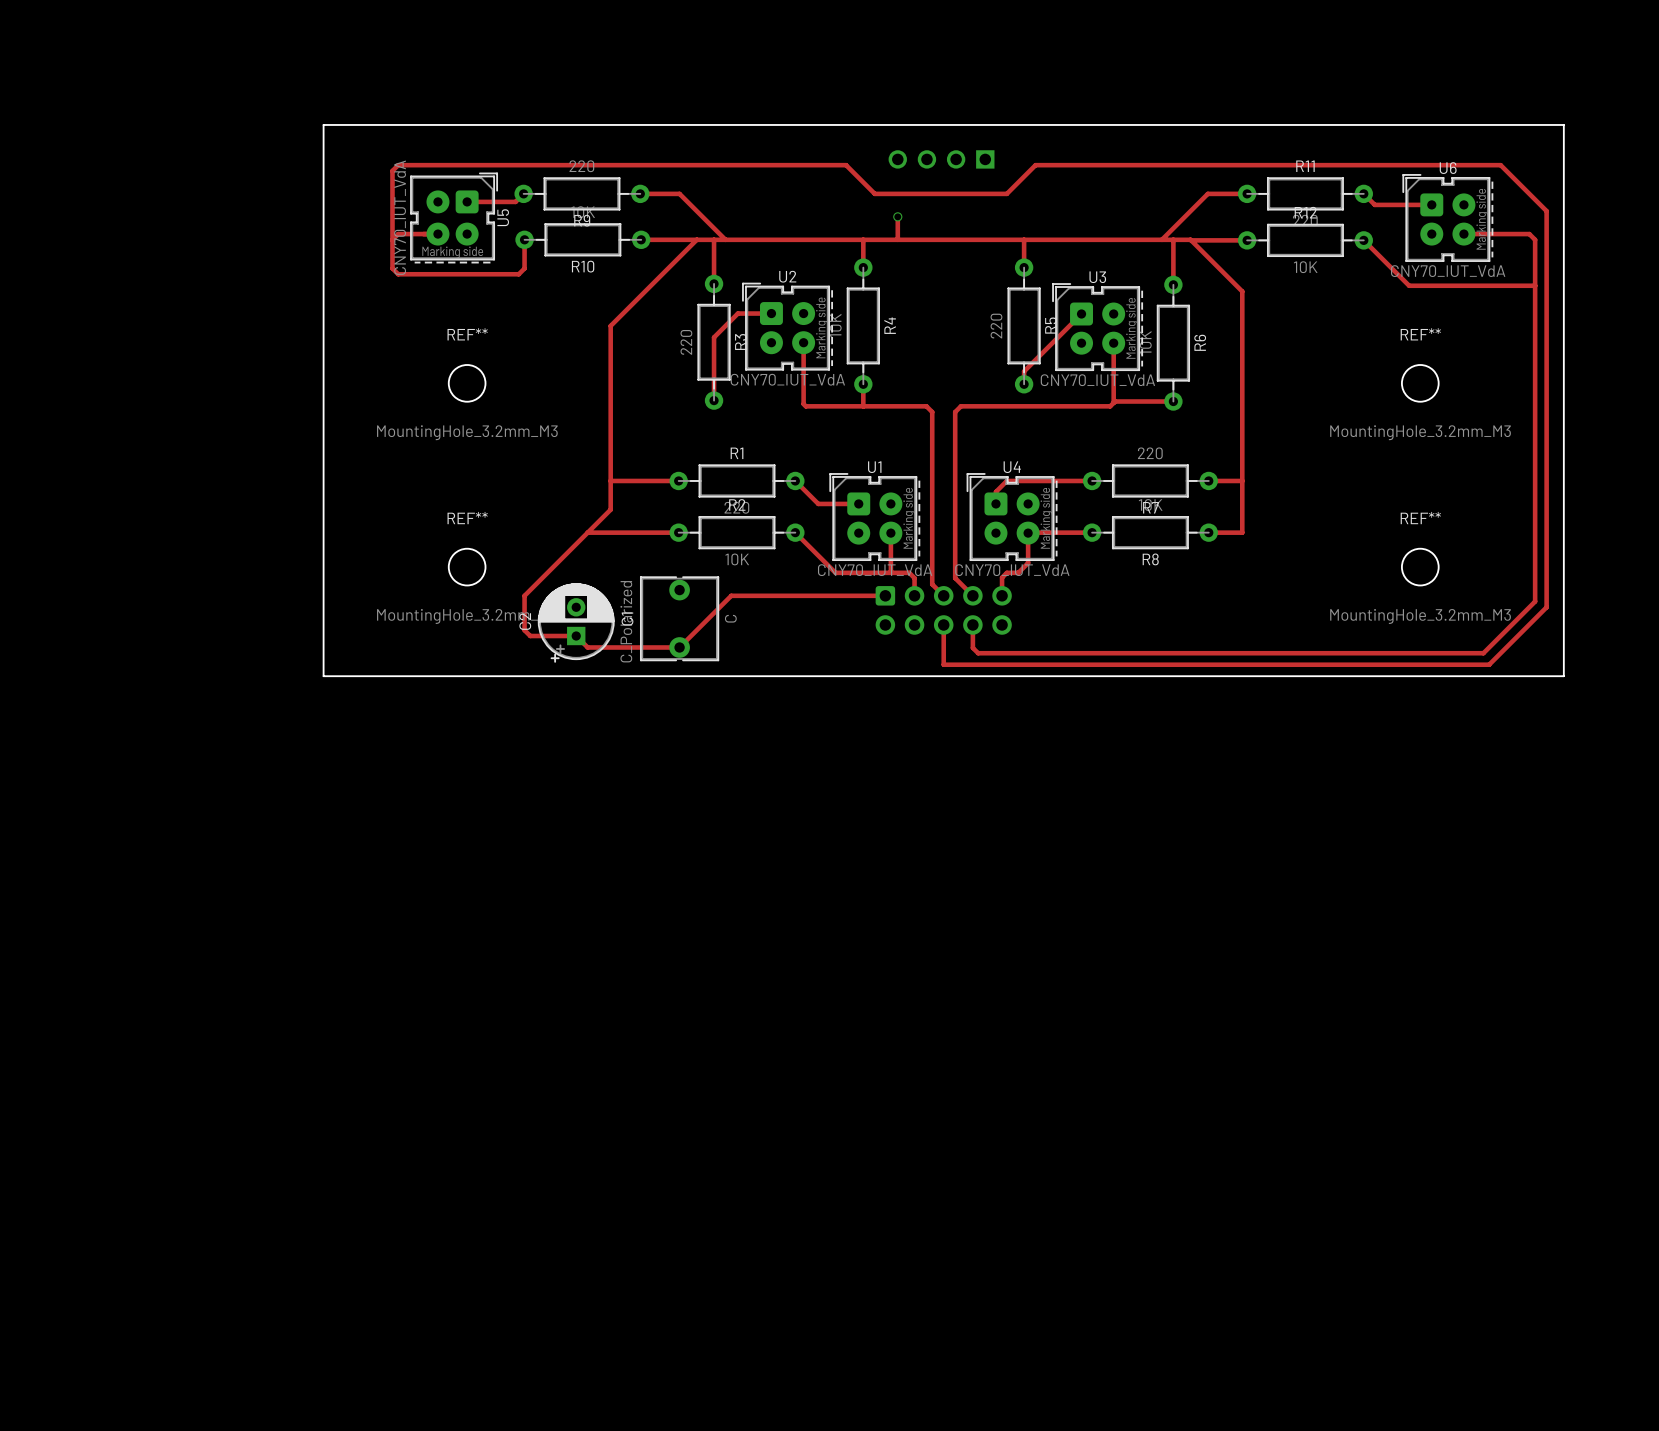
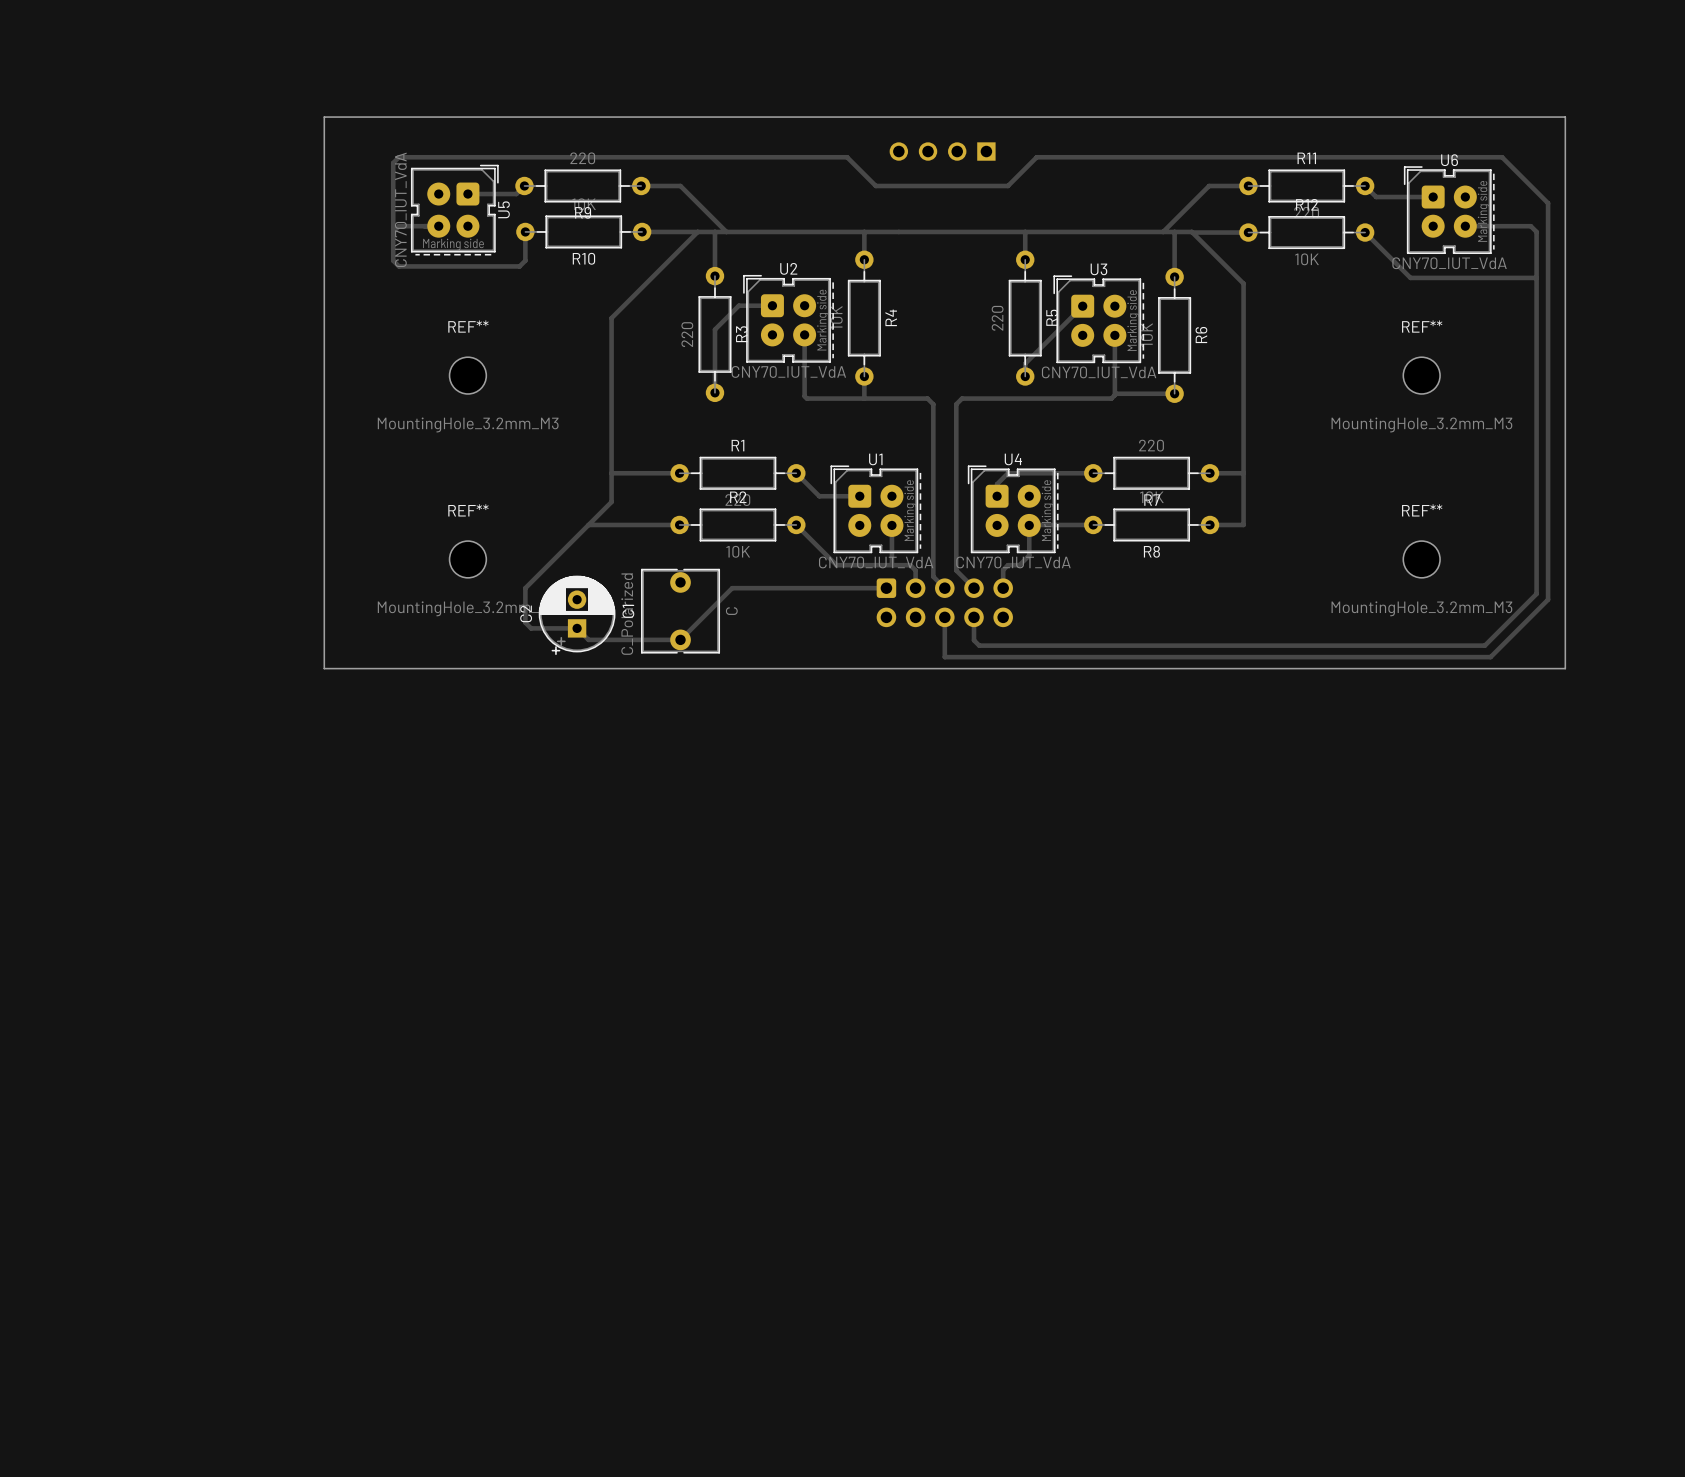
track: (897, 216) (897, 239) -> none
via: (897, 216) -> none

